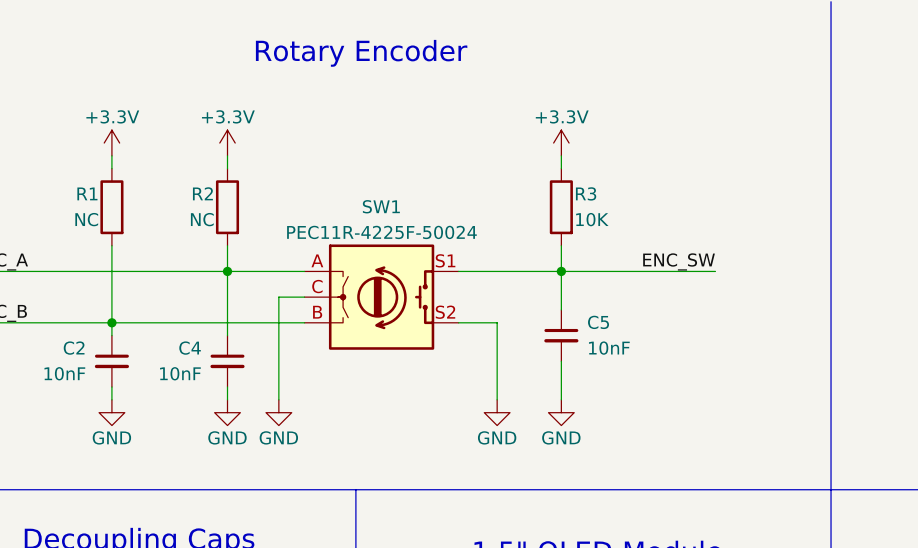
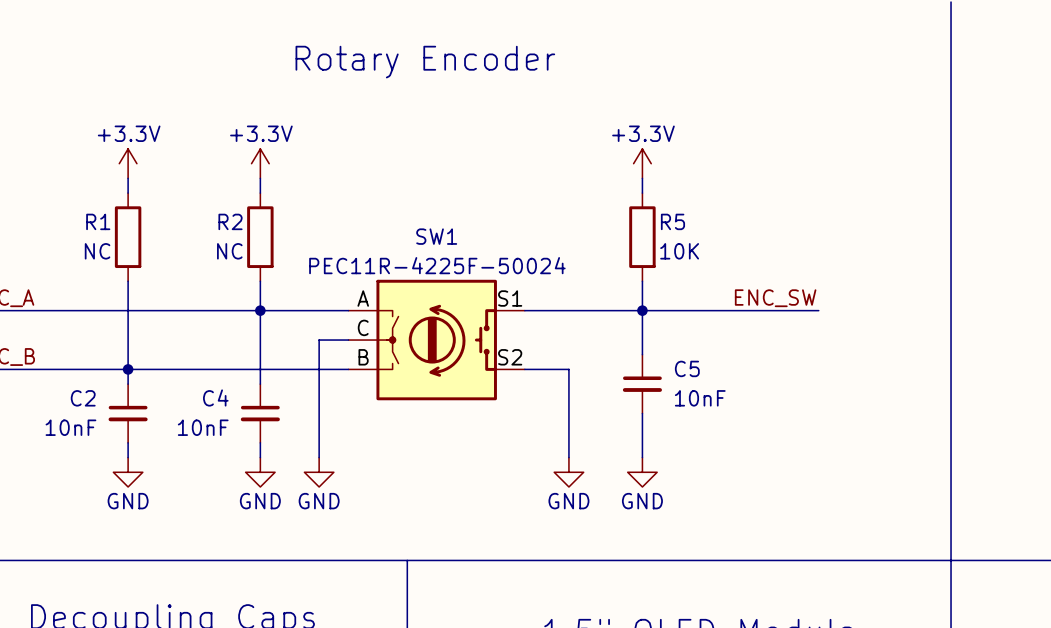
R3 name: R3 (586, 193) -> R5 (672, 221)

